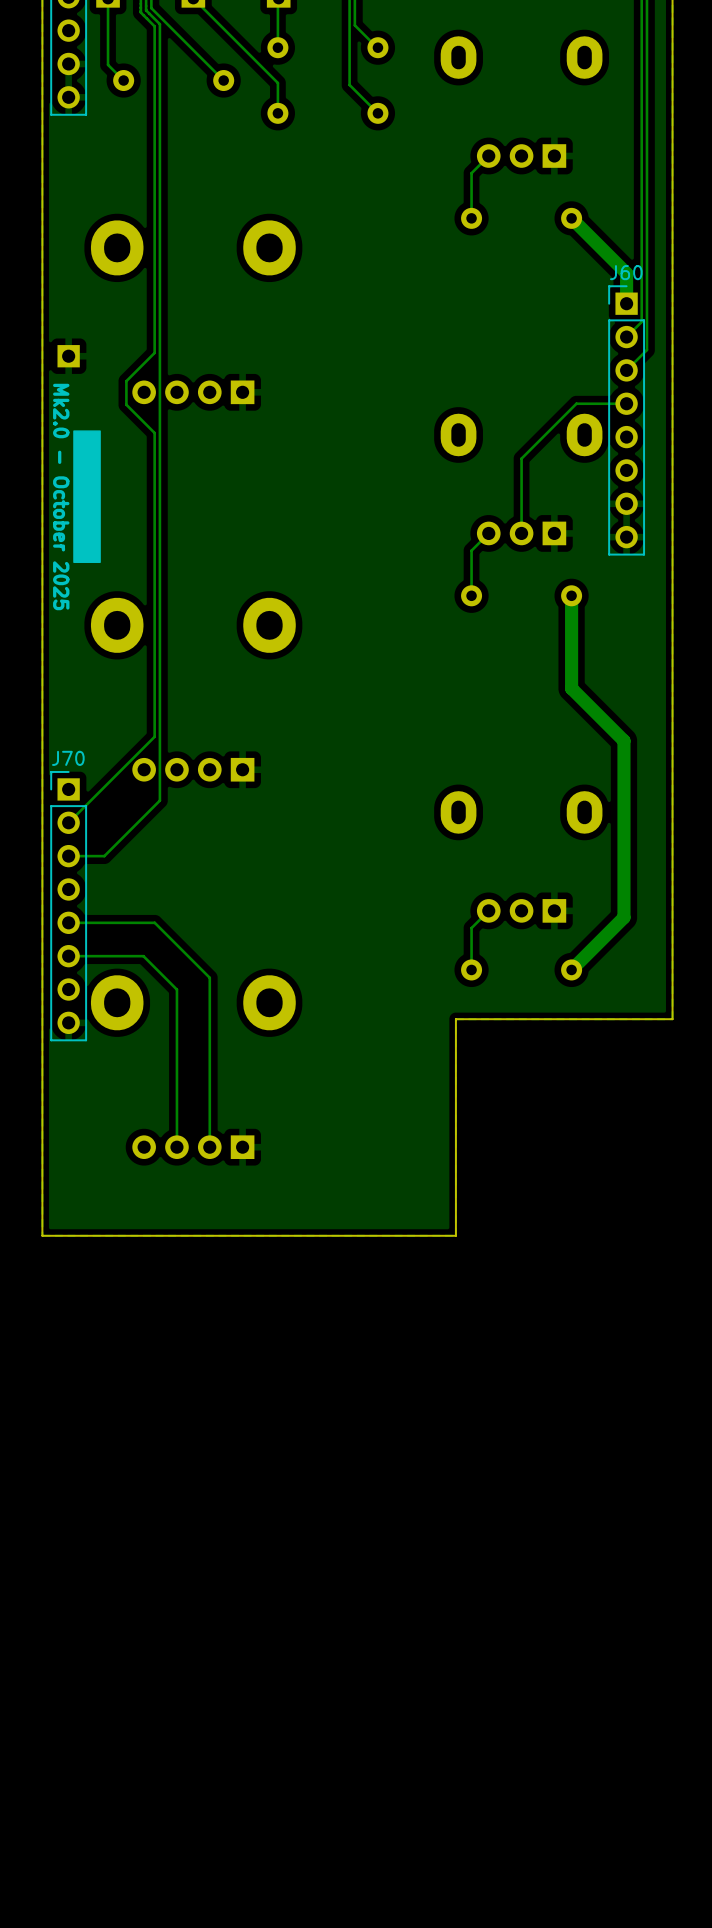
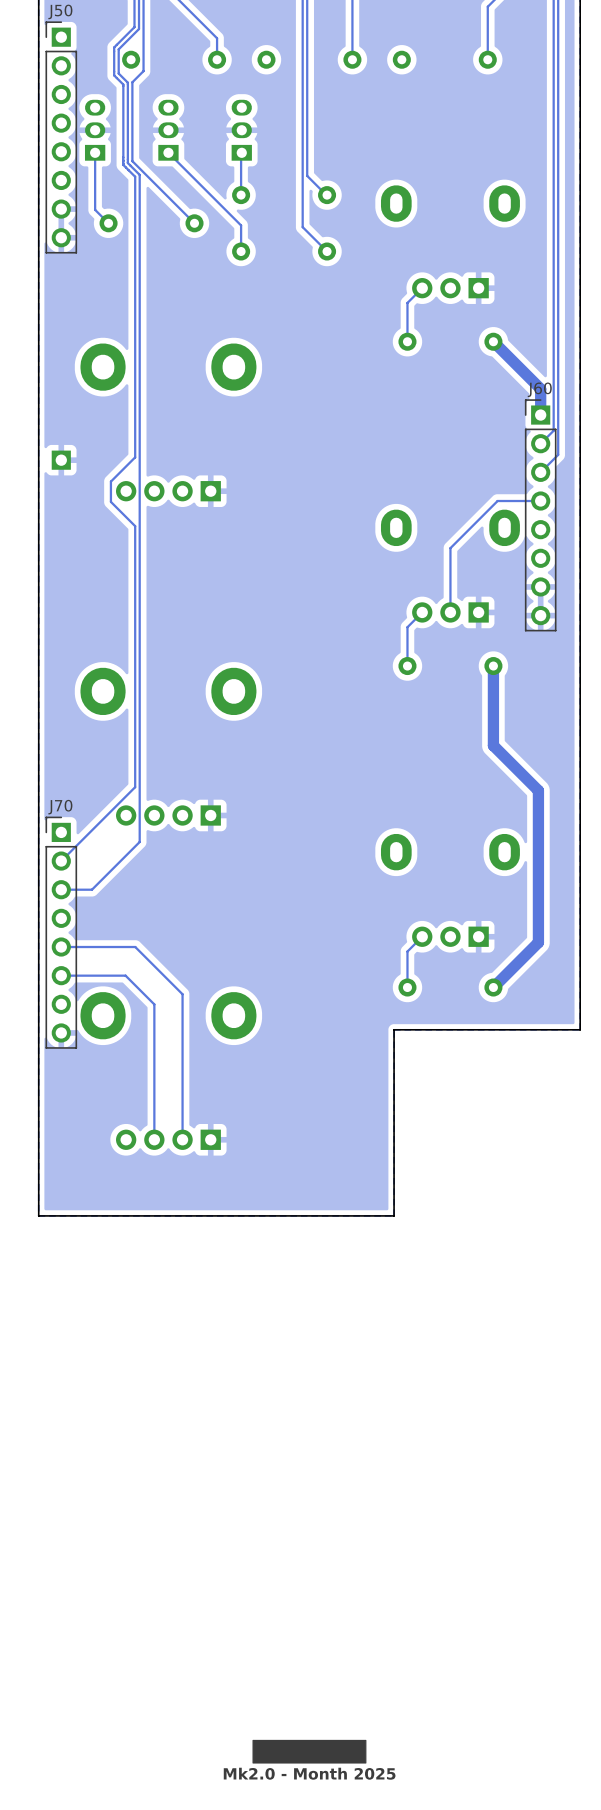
drawing: [73, 430, 101, 563] -> none
text: Mk2.0 - October 2025 (61, 496) -> none
drawing: none -> [252, 1739, 367, 1764]
text: none -> Mk2.0 - Month 2025 (309, 1773)

